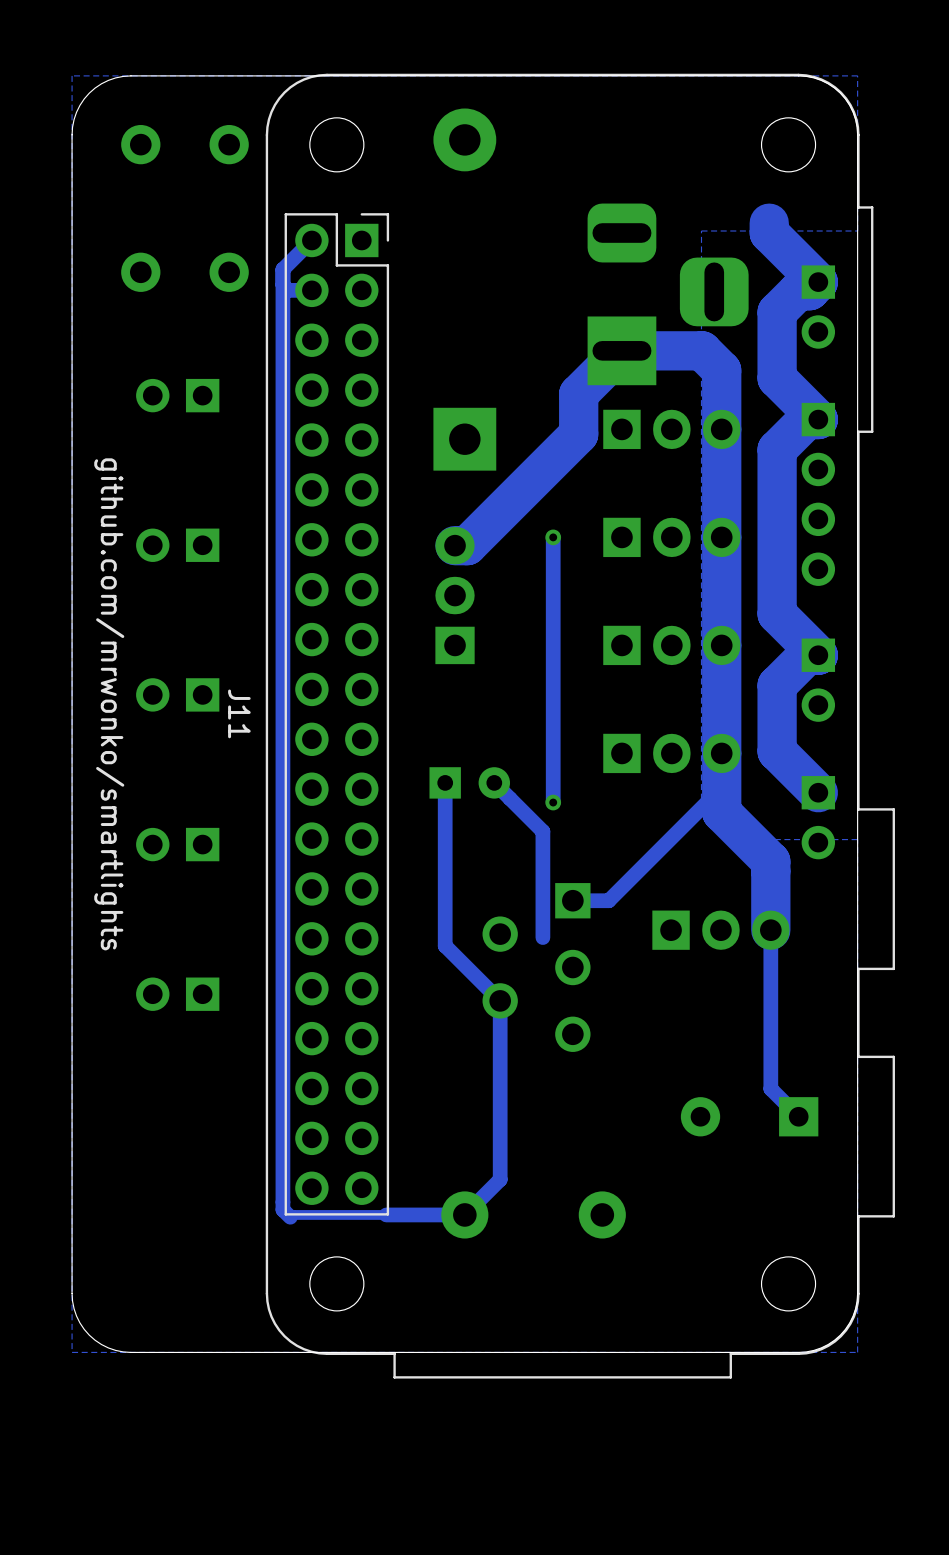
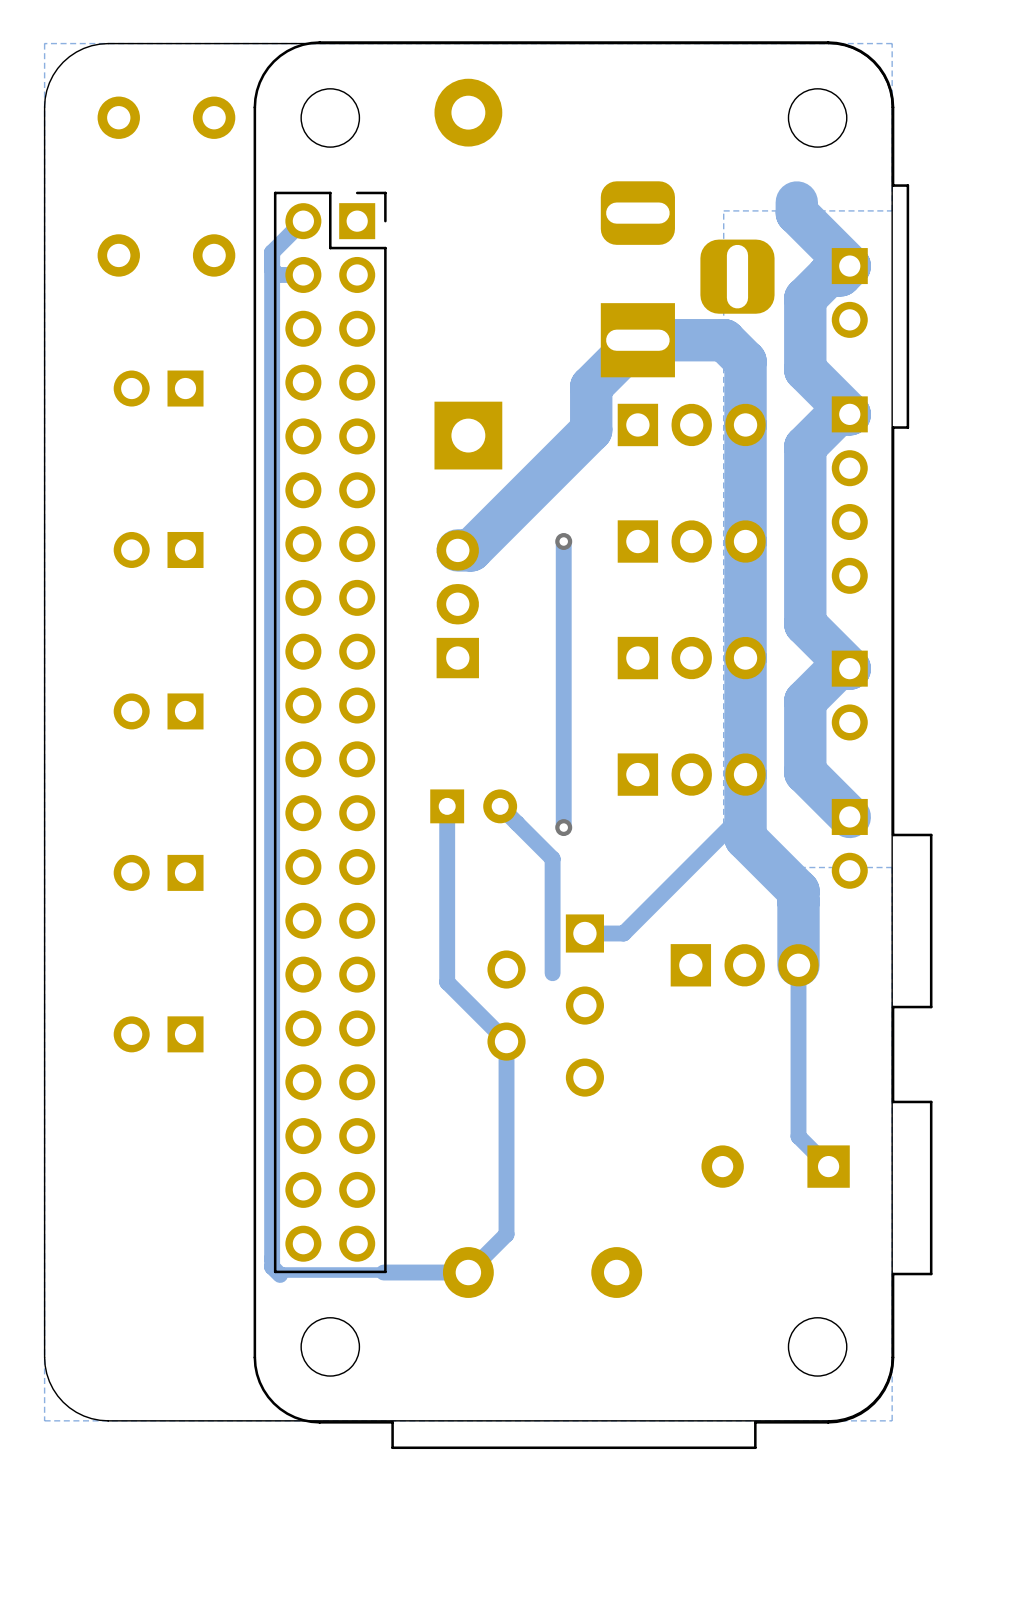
text: github.com/mrwonko/smartlights (109, 704) -> none
J11 name: J11 (239, 713) -> none

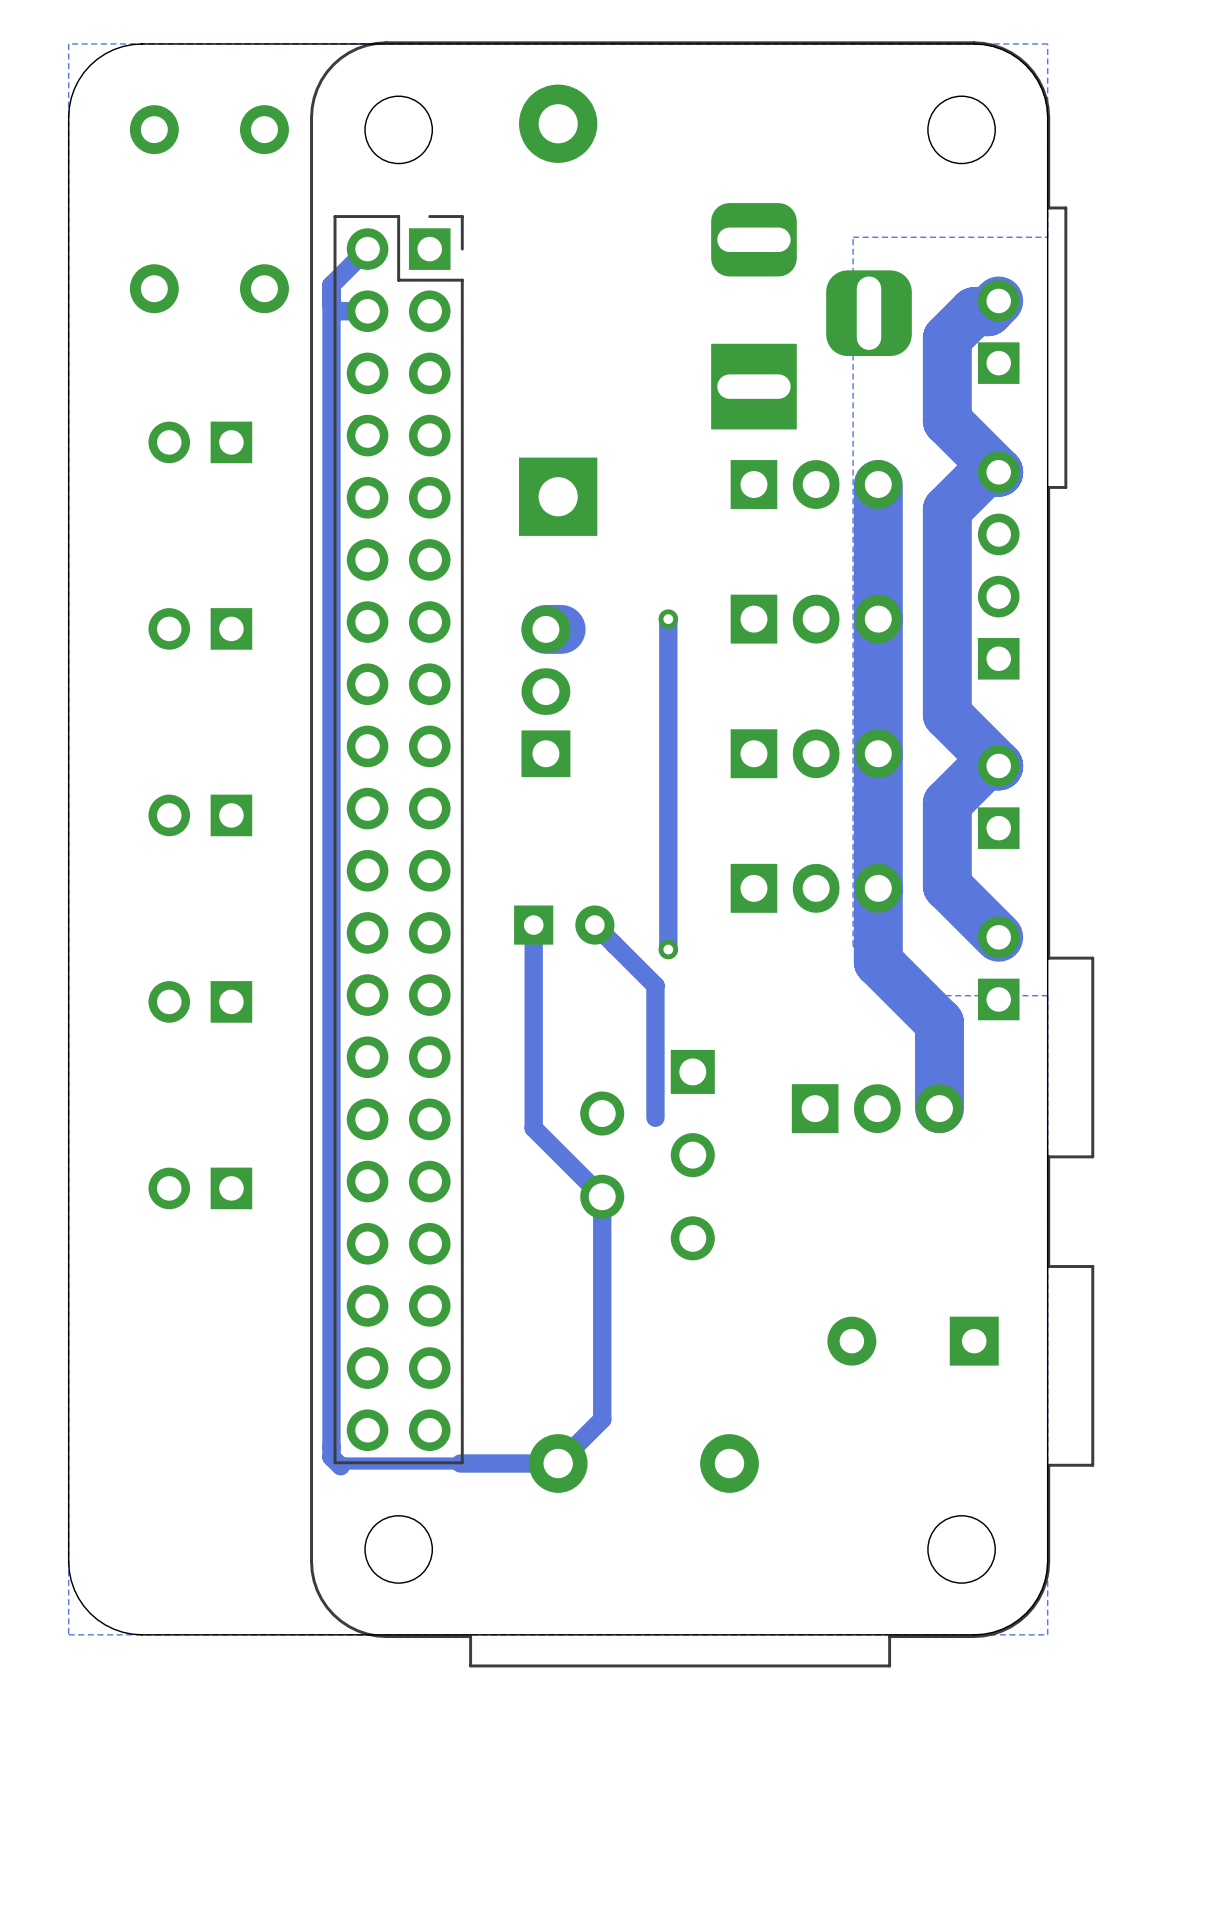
track: (796, 202) (796, 213) (849, 266) -> none
part rotation: 0° (849, 292) -> 180° (998, 332)
track: (745, 424) (745, 361) (724, 340) (637, 340) (591, 386) (591, 430) (470, 550) -> none
part rotation: 0° (849, 495) -> 180° (998, 565)
part rotation: 0° (849, 695) -> 180° (998, 797)
track: (745, 811) (623, 933) (584, 933) -> none
part rotation: 0° (849, 843) -> 180° (998, 968)
track: (798, 965) (798, 1136) (828, 1166) -> none

